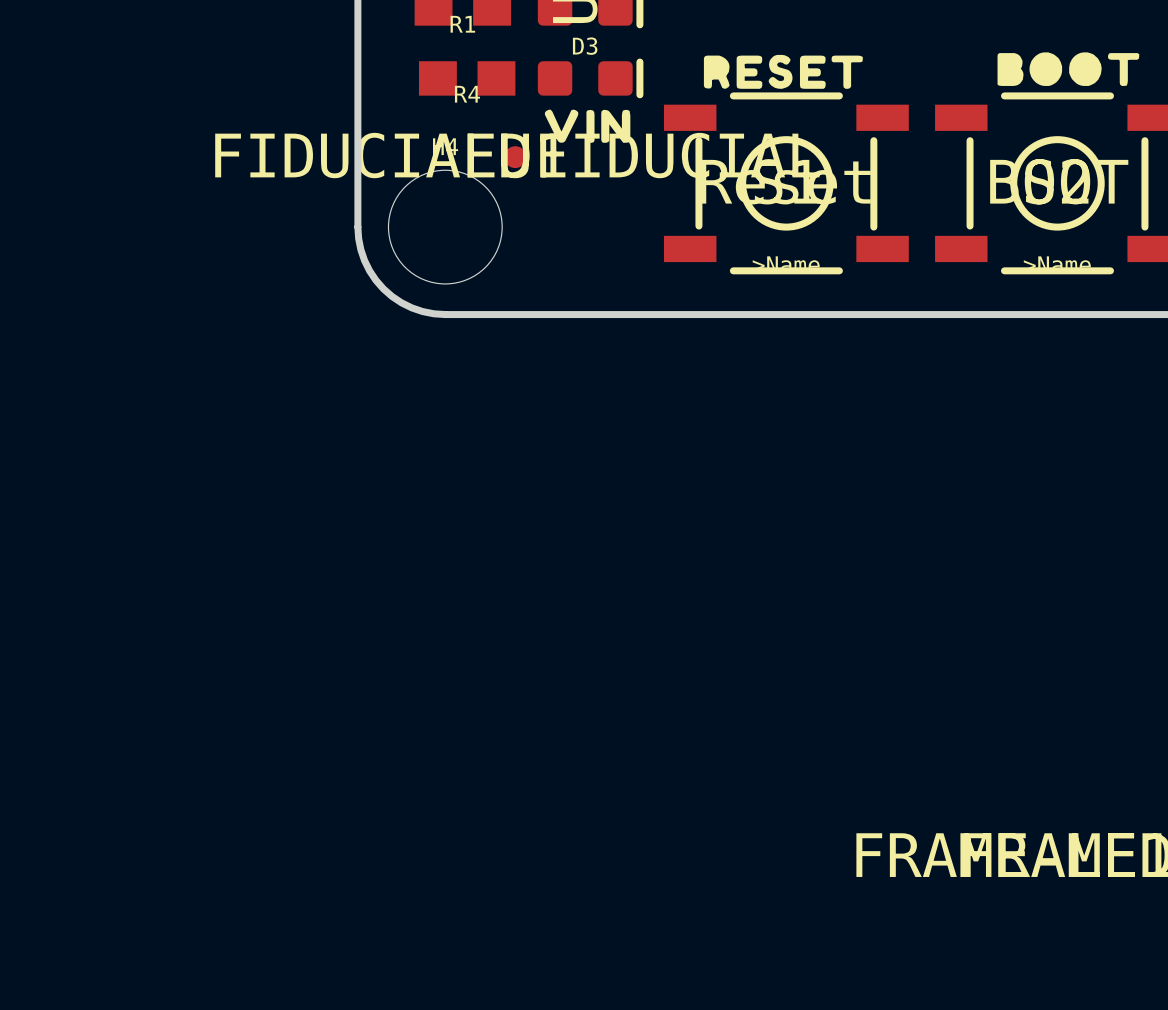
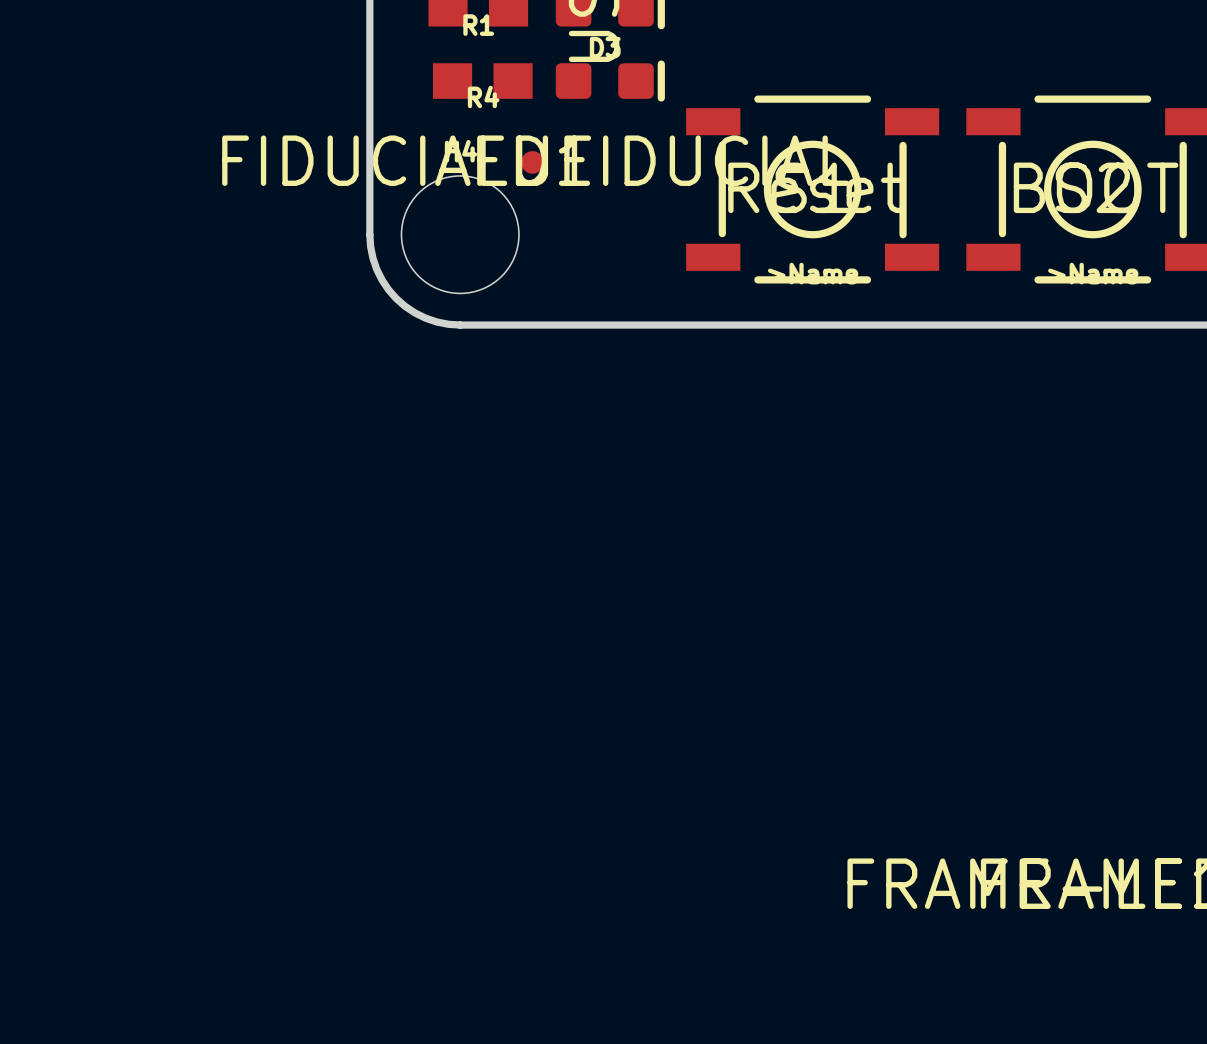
drawing: [997, 52, 1140, 86] -> none
drawing: [703, 54, 863, 89] -> none
drawing: [544, 109, 631, 143] -> none

